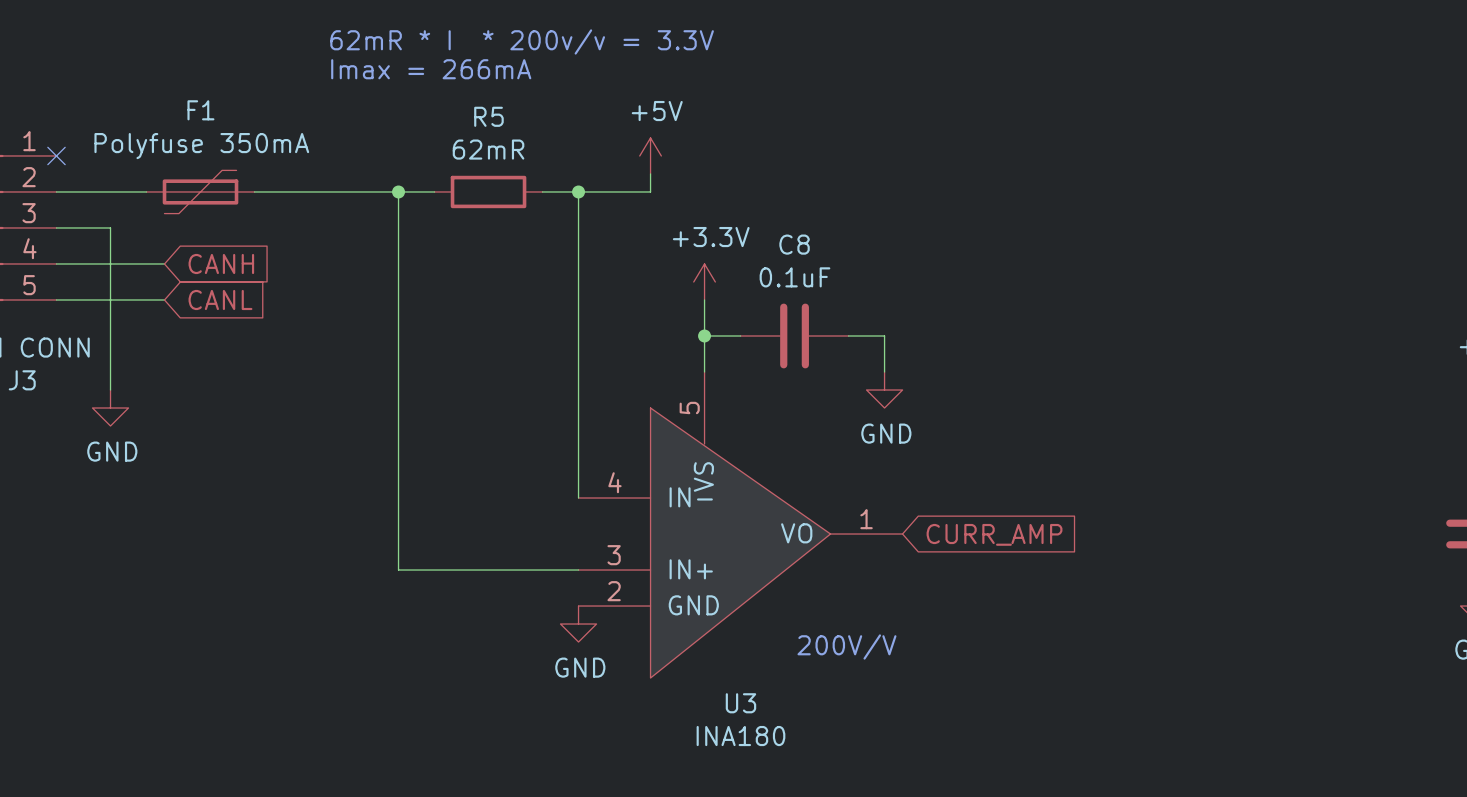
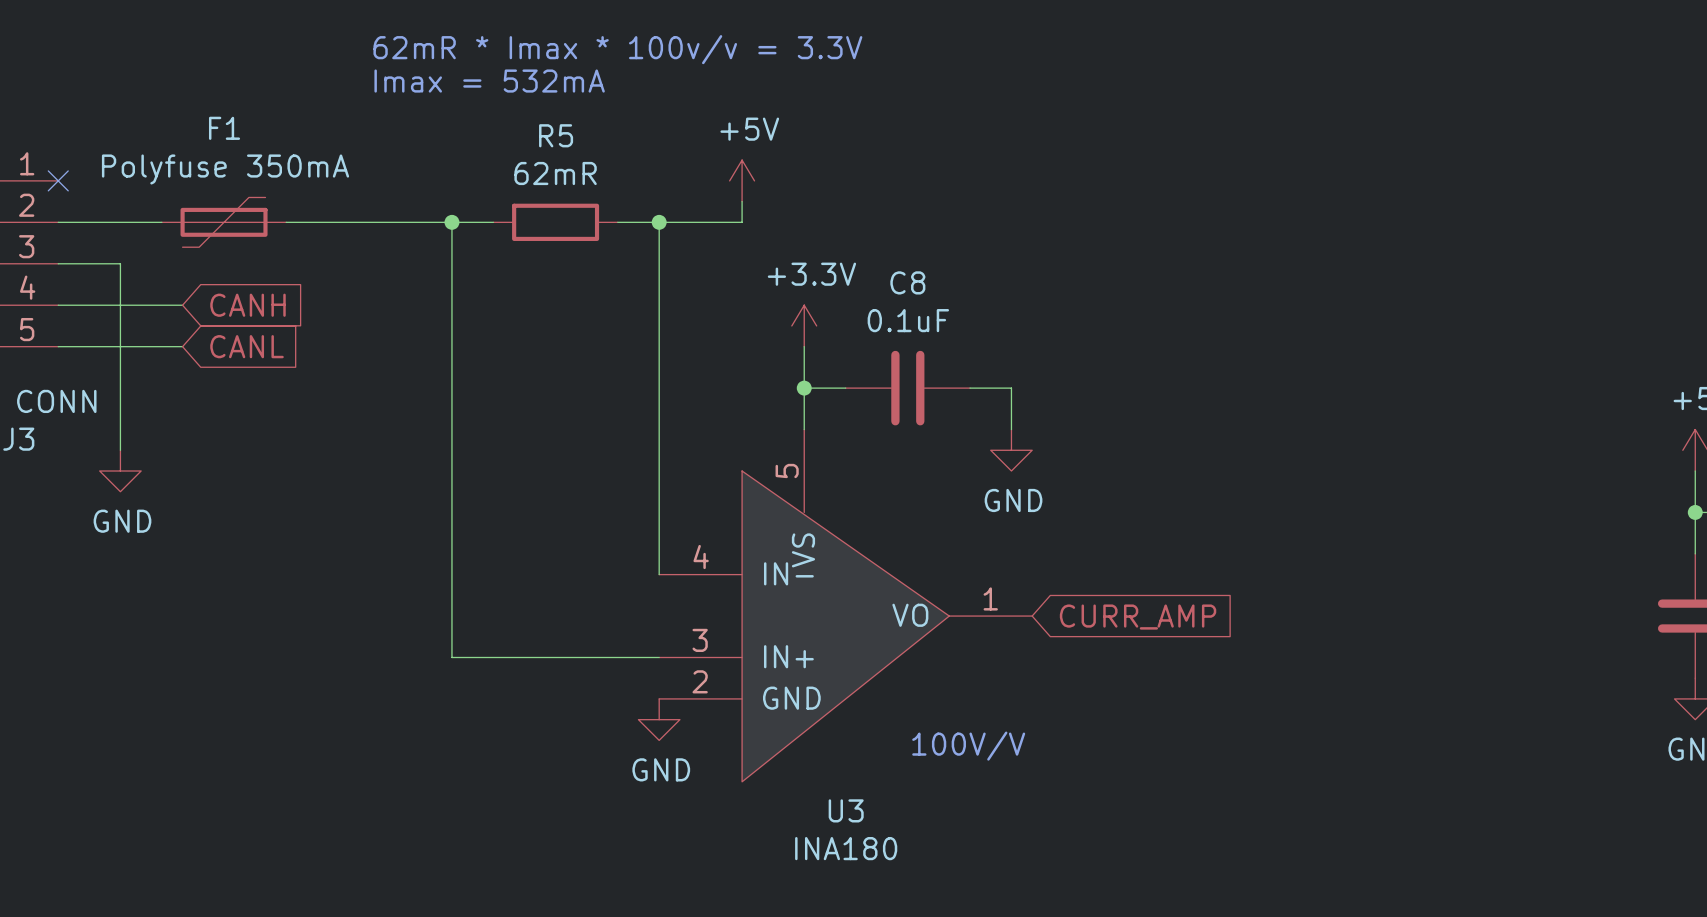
text: 62mR * I * 200v/v = 3.3V (522, 41) -> 62mR * Imax * 100v/v = 3.3V (617, 49)
text: Imax = 266mA (431, 69) -> Imax = 532mA (489, 81)
text: 200V/V (846, 646) -> 100V/V (968, 746)

